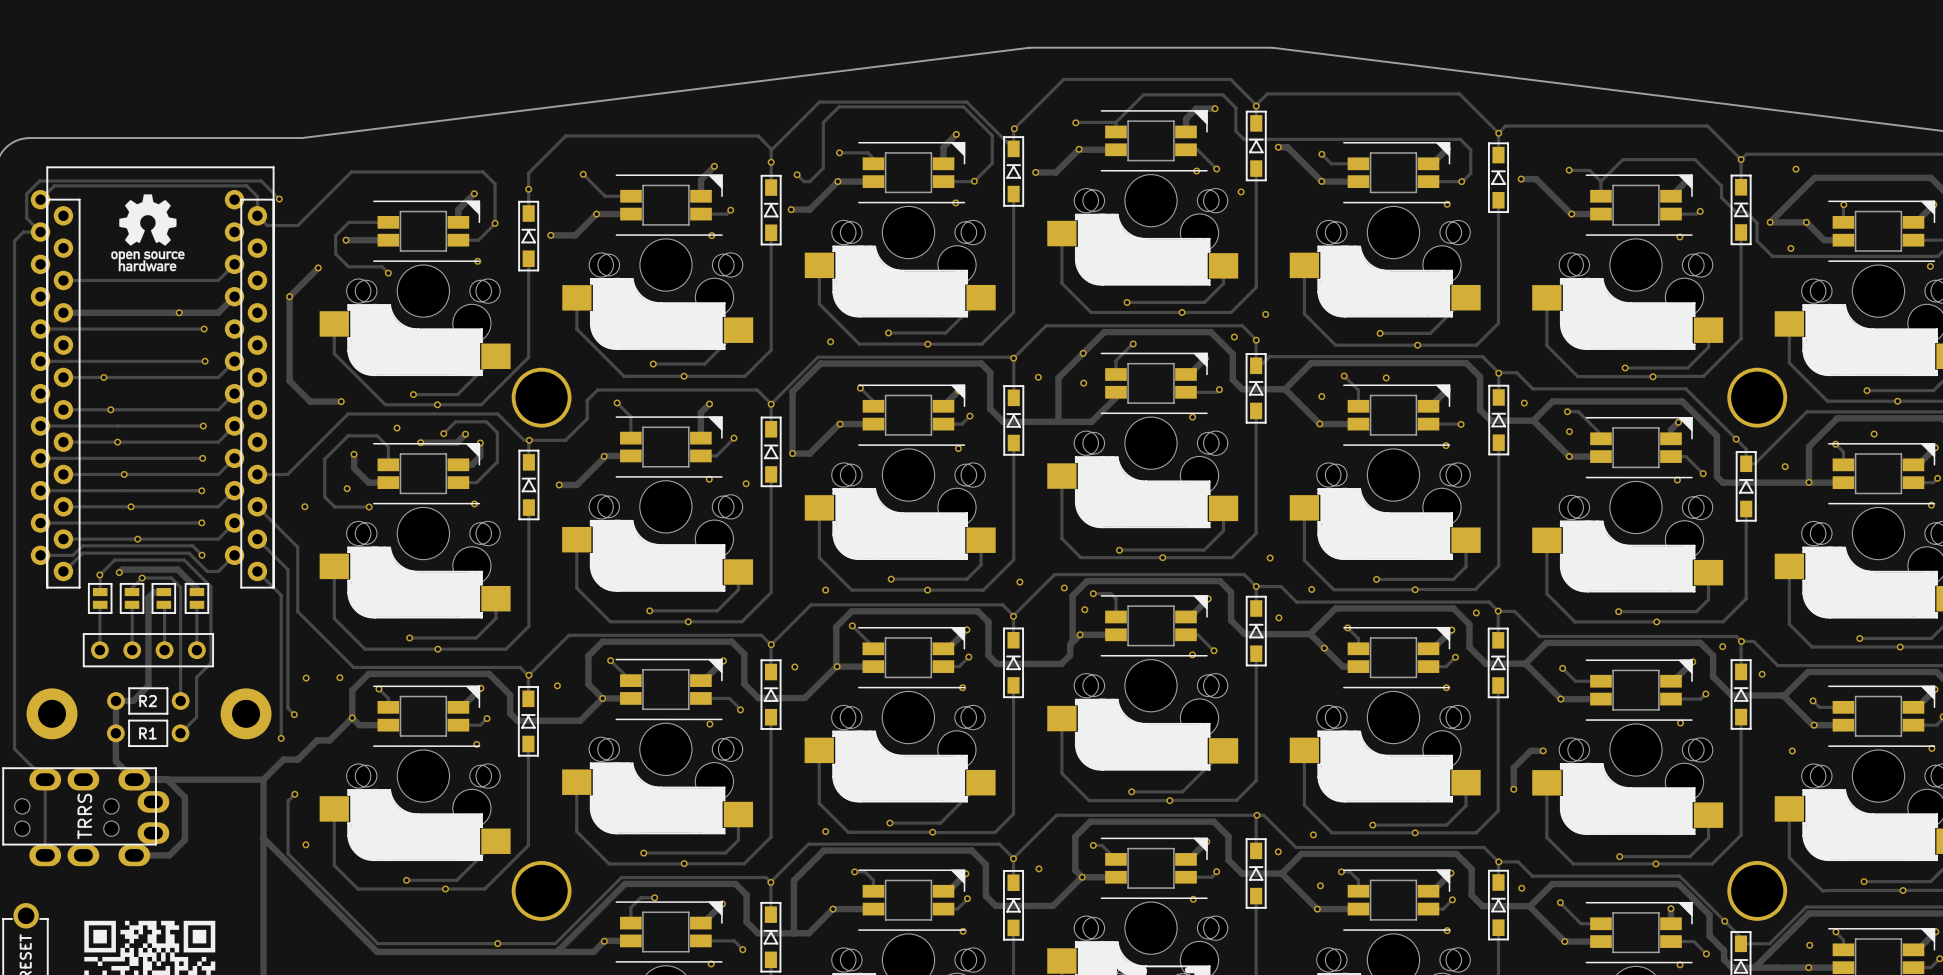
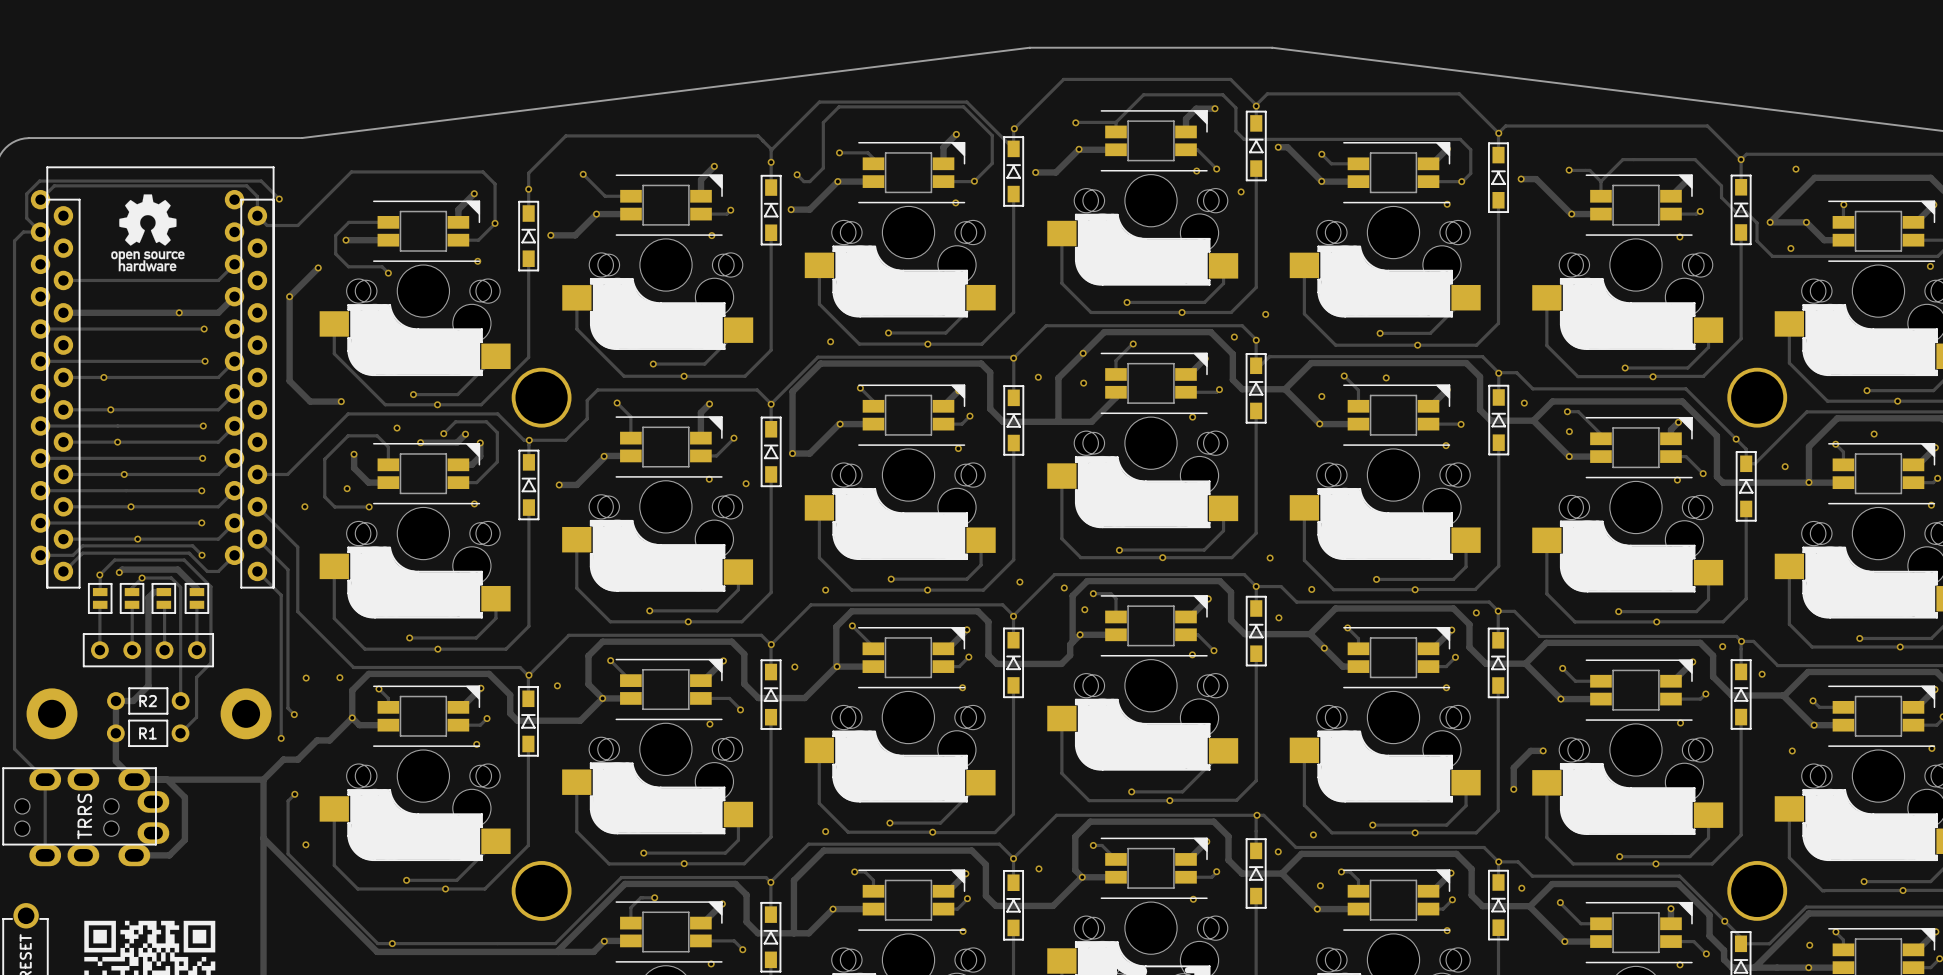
via: none -> (392, 943)
via: (497, 943) -> none

